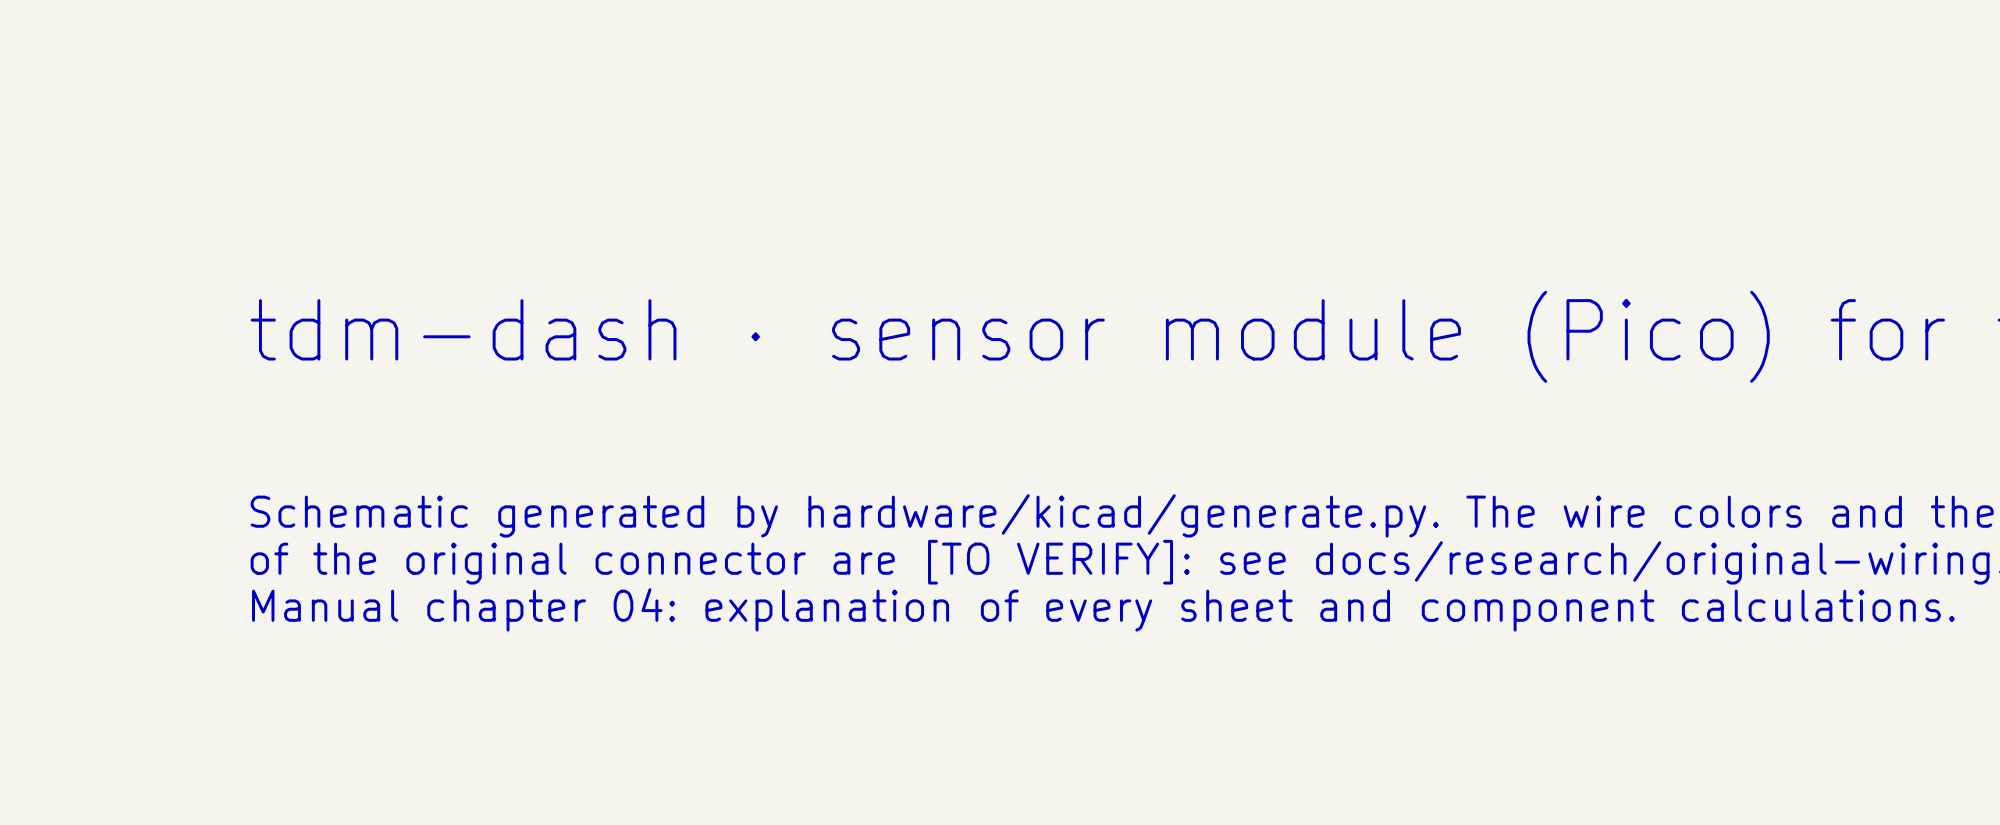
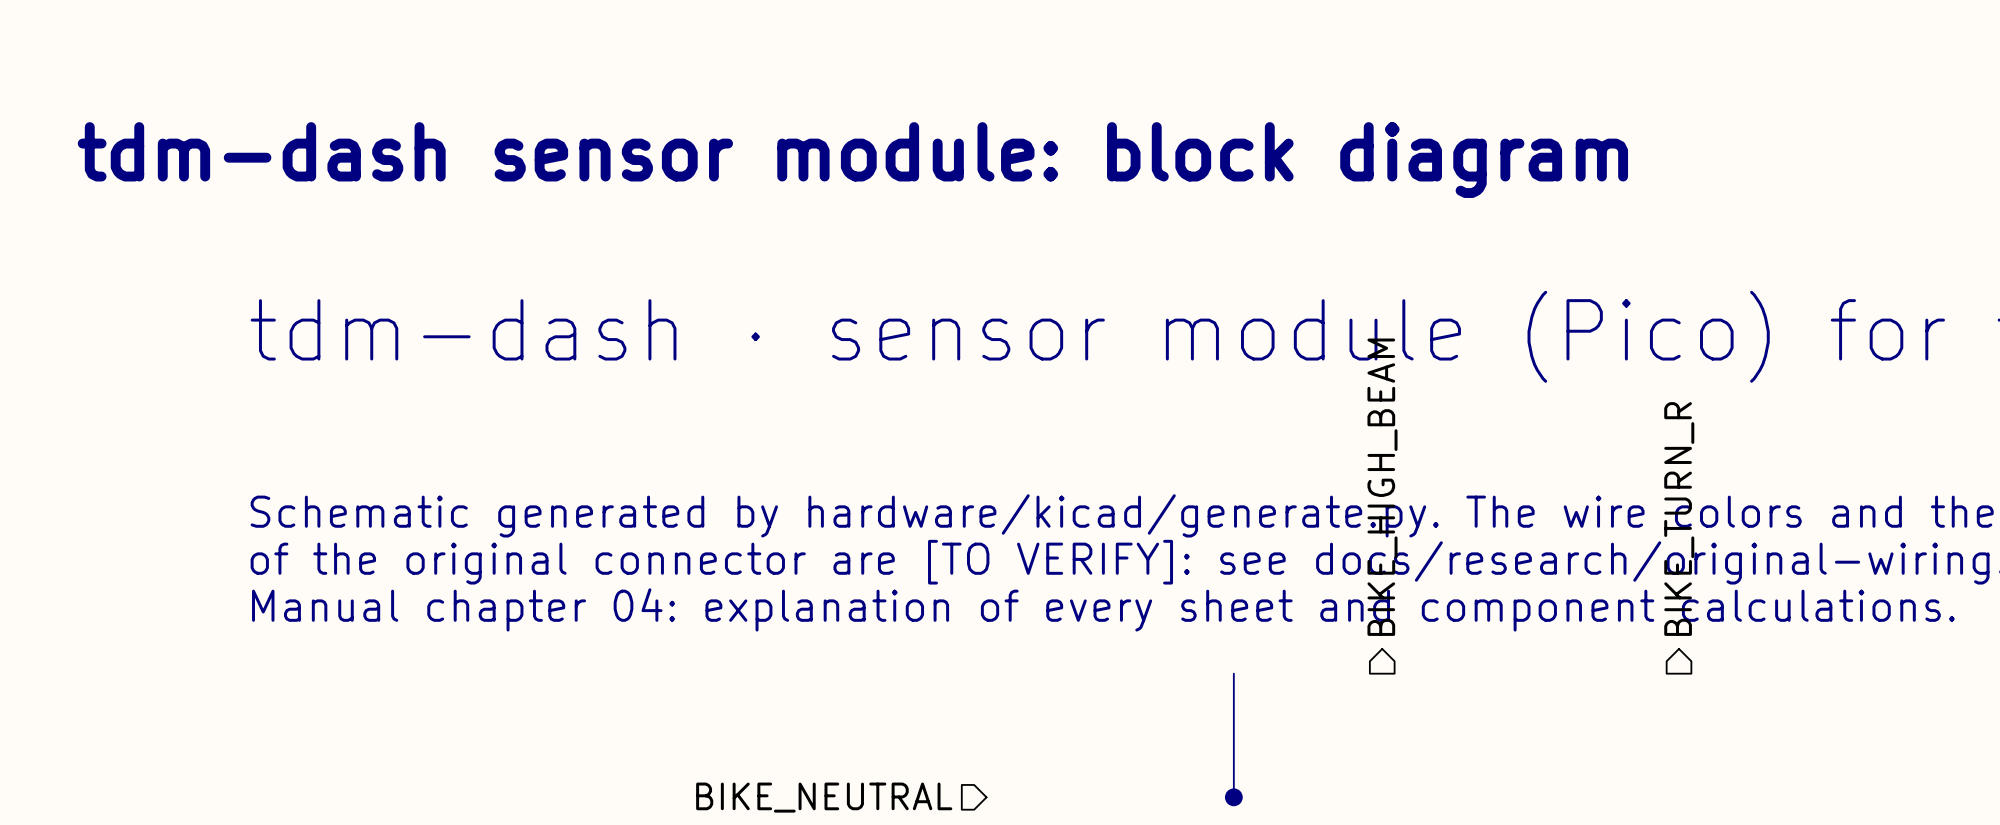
text: none -> tdm-dash sensor module: block diagram (852, 160)
sheet pin: none -> BIKE_HIGH_BEAM (1382, 487)
sheet pin: none -> BIKE_TURN_R (1679, 519)
wire: none -> (1233, 673) (1233, 797)
sheet pin: none -> BIKE_NEUTRAL (824, 797)
junction: none -> (1233, 797)

